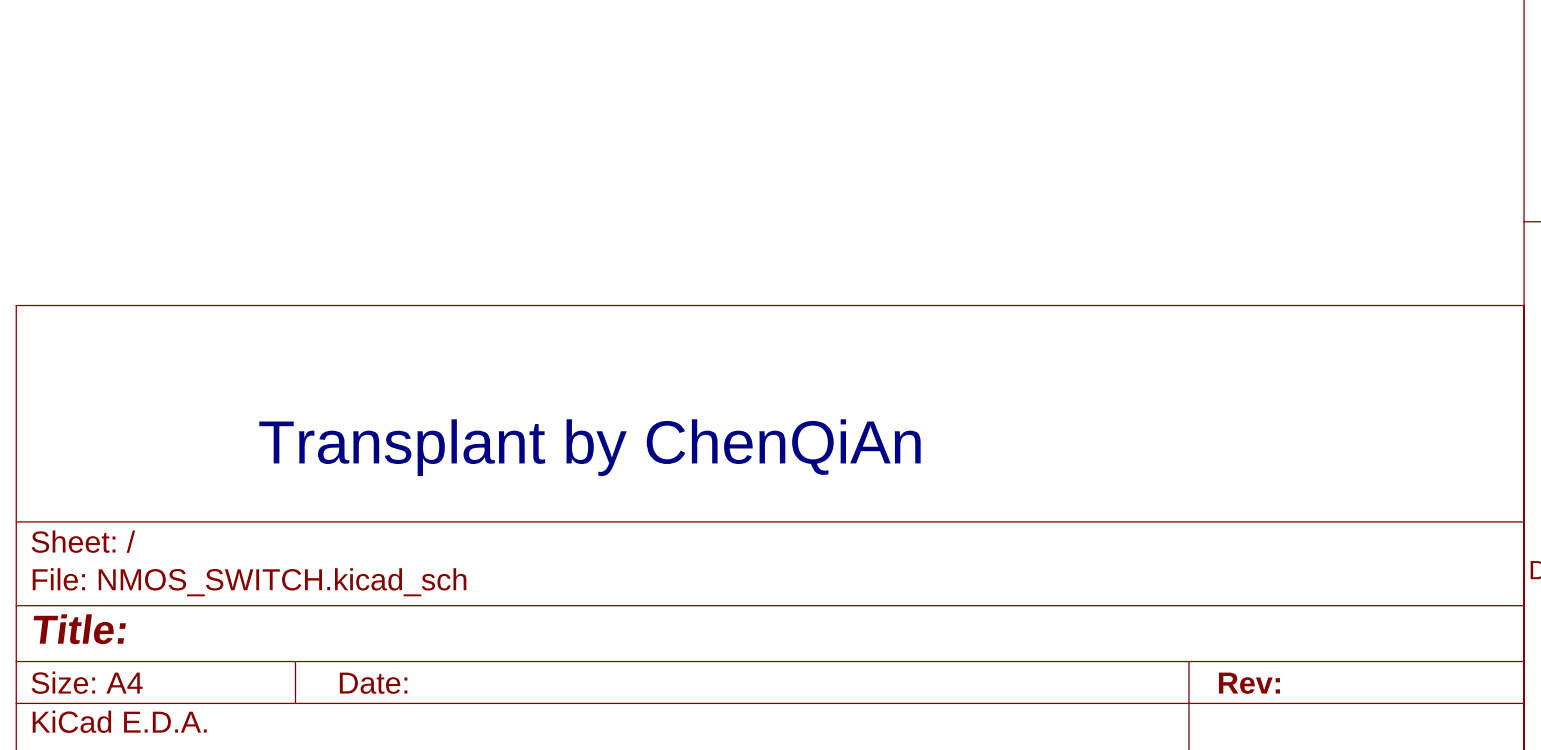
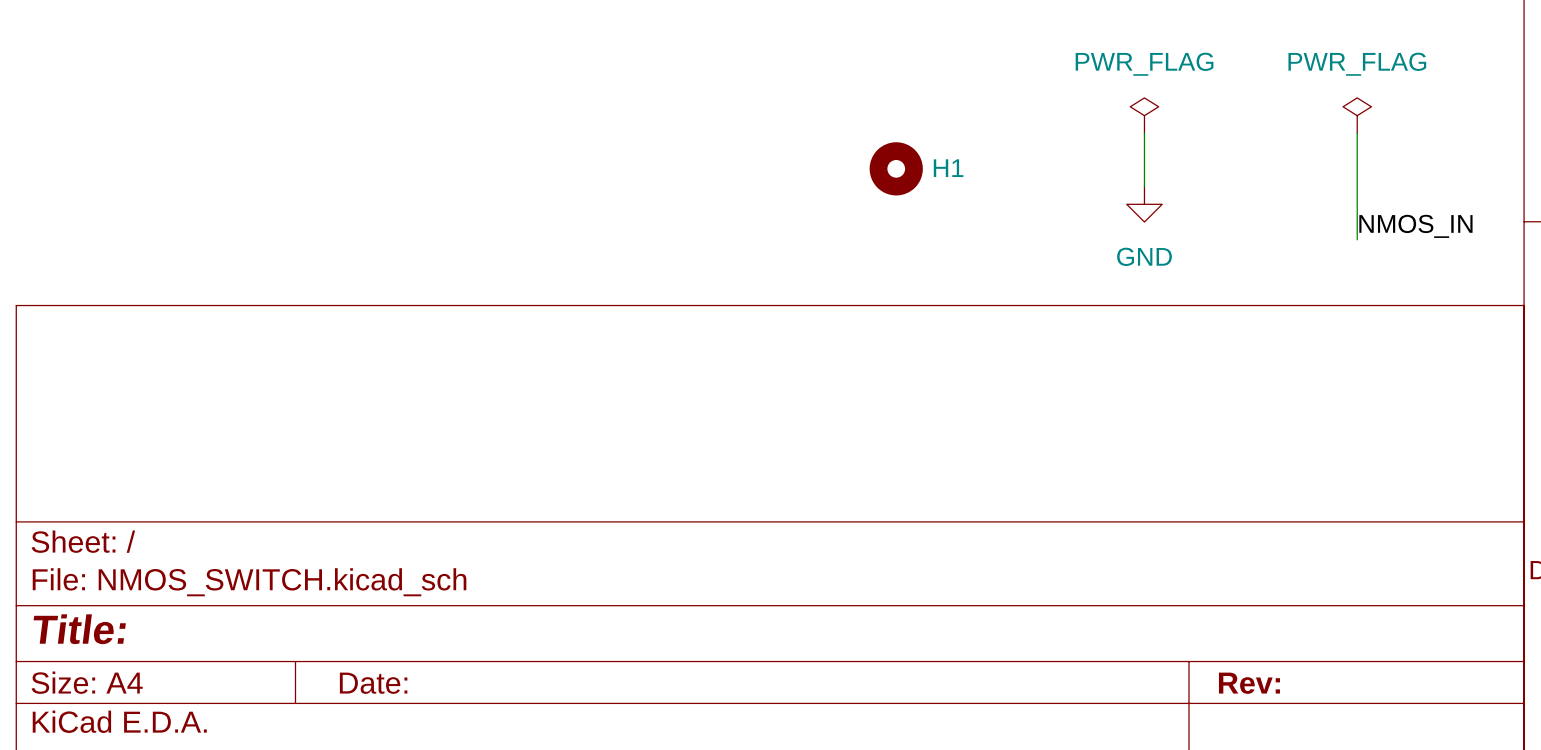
power symbol: none -> PWR_FLAG (1144, 115)
power symbol: none -> PWR_FLAG (1357, 115)
wire: none -> (1144, 133) (1144, 186)
wire: none -> (1357, 133) (1357, 239)
H1: none -> (896, 168)
power symbol: none -> GND (1144, 204)
label: none -> NMOS_IN (1415, 226)
text: Transplant by ChenQiAn (589, 447) -> none

